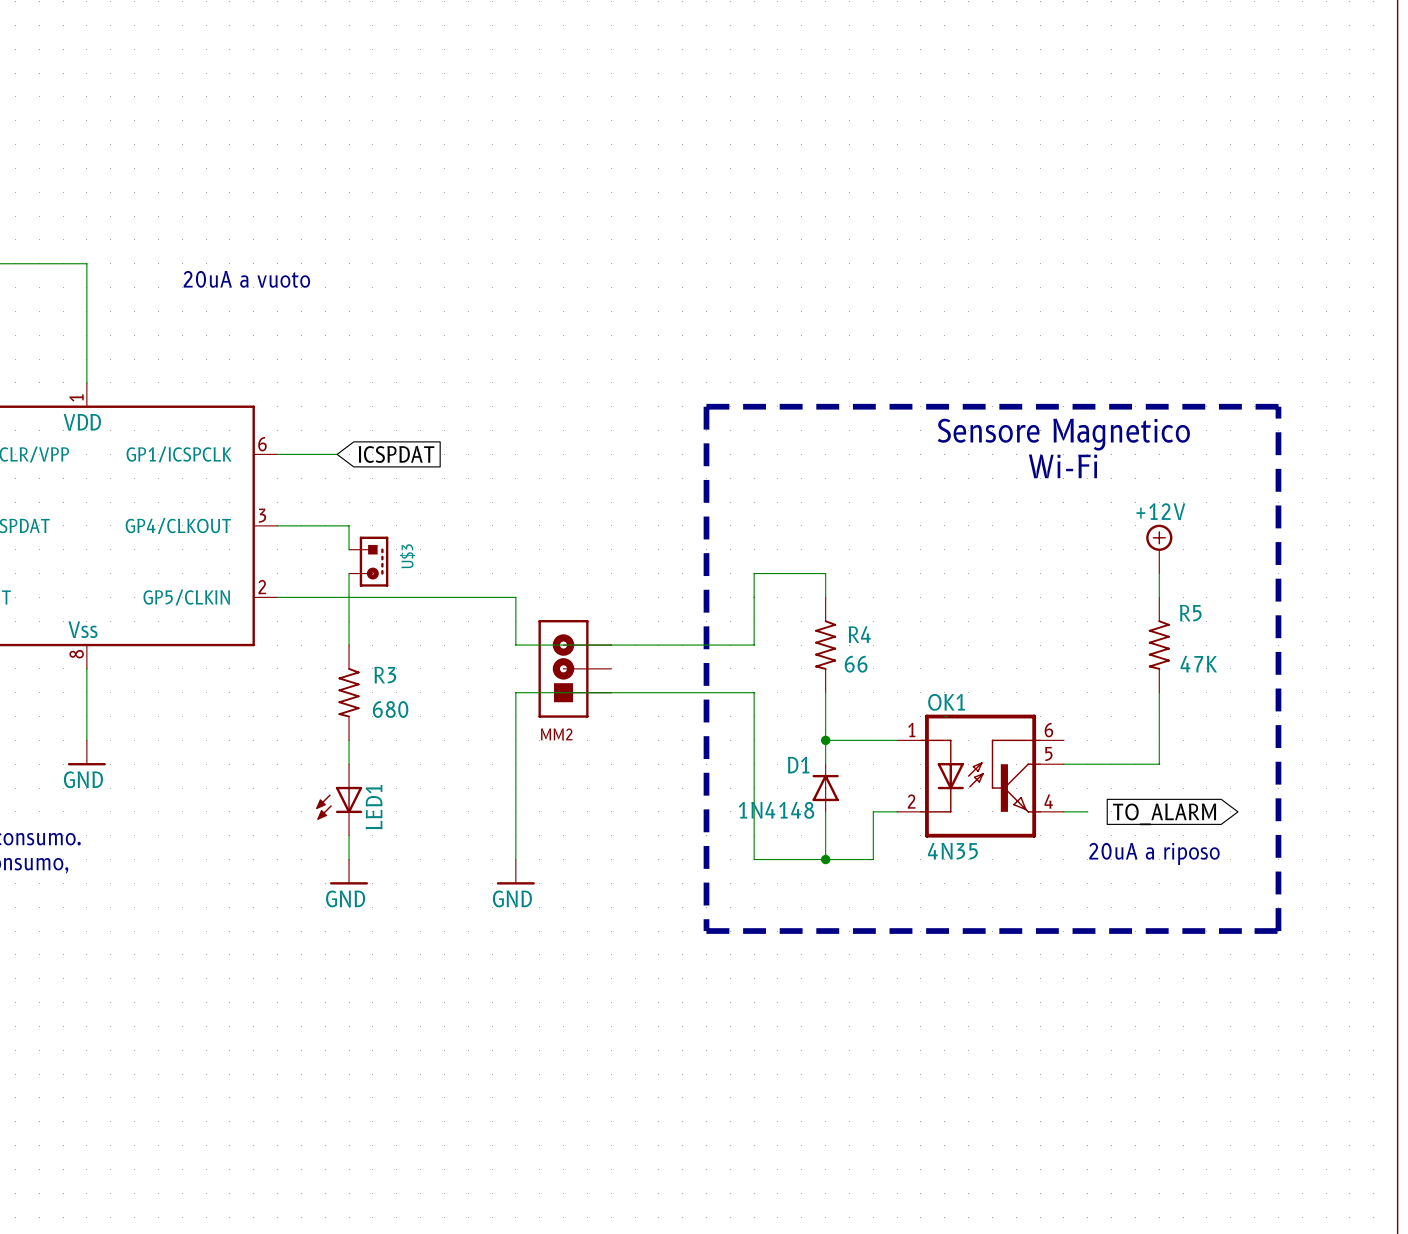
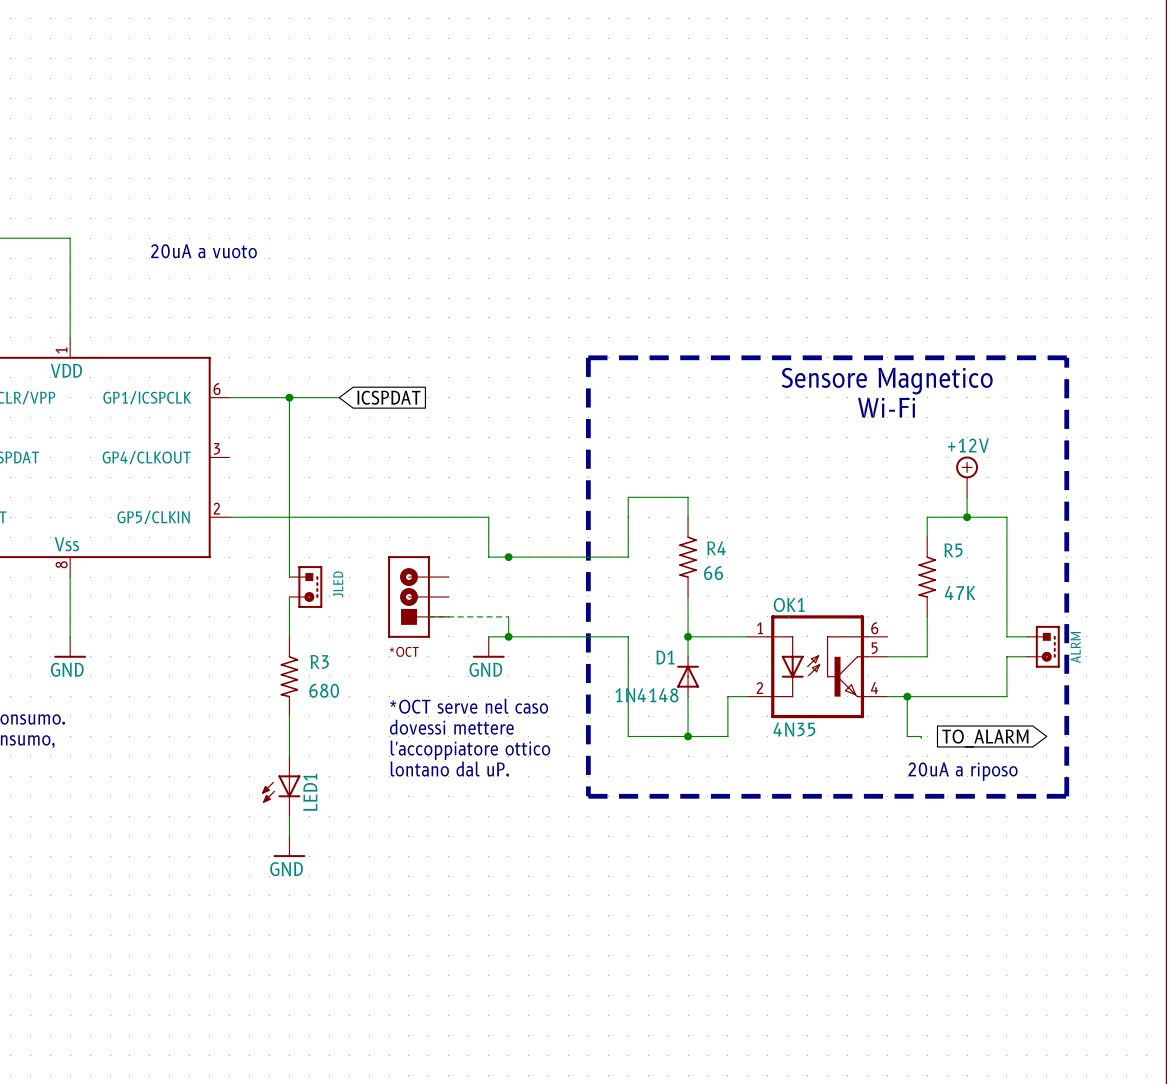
wire: none -> (279, 397) (339, 397)
junction: none -> (289, 397)
global label position: ICSPDAT (396, 454) -> ICSPDAT (388, 397)
wire: (277, 525) (349, 525) -> (289, 397) (289, 457)
wire: none -> (289, 477) (289, 497)
U$3: (368, 561) -> none
wire: (515, 597) (515, 645) (587, 645) -> (428, 517) (488, 517) (488, 557)
junction: none -> (967, 517)
wire: none -> (927, 537) (927, 517) (1006, 517) (1006, 636) (1026, 636)
junction: none -> (508, 557)
R5 position: (1159, 645) -> (927, 577)
MM2: (574, 668) -> none
JLED: none -> (305, 587)
R3 position: (349, 692) -> (289, 676)
*OCT: none -> (418, 596)
wire: (1159, 692) (1159, 764) (1111, 764) -> (927, 616) (927, 656)
wire: none -> (428, 616) (508, 616) (508, 636)
junction: none -> (508, 636)
wire: (754, 740) (754, 692) (515, 692) (515, 859) -> (628, 636) (488, 636)
power symbol: none -> GND (488, 647)
ALRM: none -> (1043, 646)
wire: none -> (1026, 656) (1006, 656) (1006, 696) (907, 696) (907, 736) (921, 736) (921, 738)
LED1 position: (339, 799) -> (281, 786)
junction: none -> (907, 696)
global label position: TO_ALARM (1164, 814) -> TO_ALARM (985, 738)
text: none -> *OCT serve nel caso (469, 706)
text: none -> dovessi mettere (451, 727)
text position: 20uA a riposo (1154, 853) -> 20uA a riposo (963, 771)
power symbol: GND (349, 872) -> none
power symbol: GND (515, 872) -> none
text: none -> l'accoppiatore ottico (470, 750)
text: none -> lontano dal uP. (449, 769)
wire: none -> (289, 816) (289, 836)
power symbol: none -> GND (289, 846)

